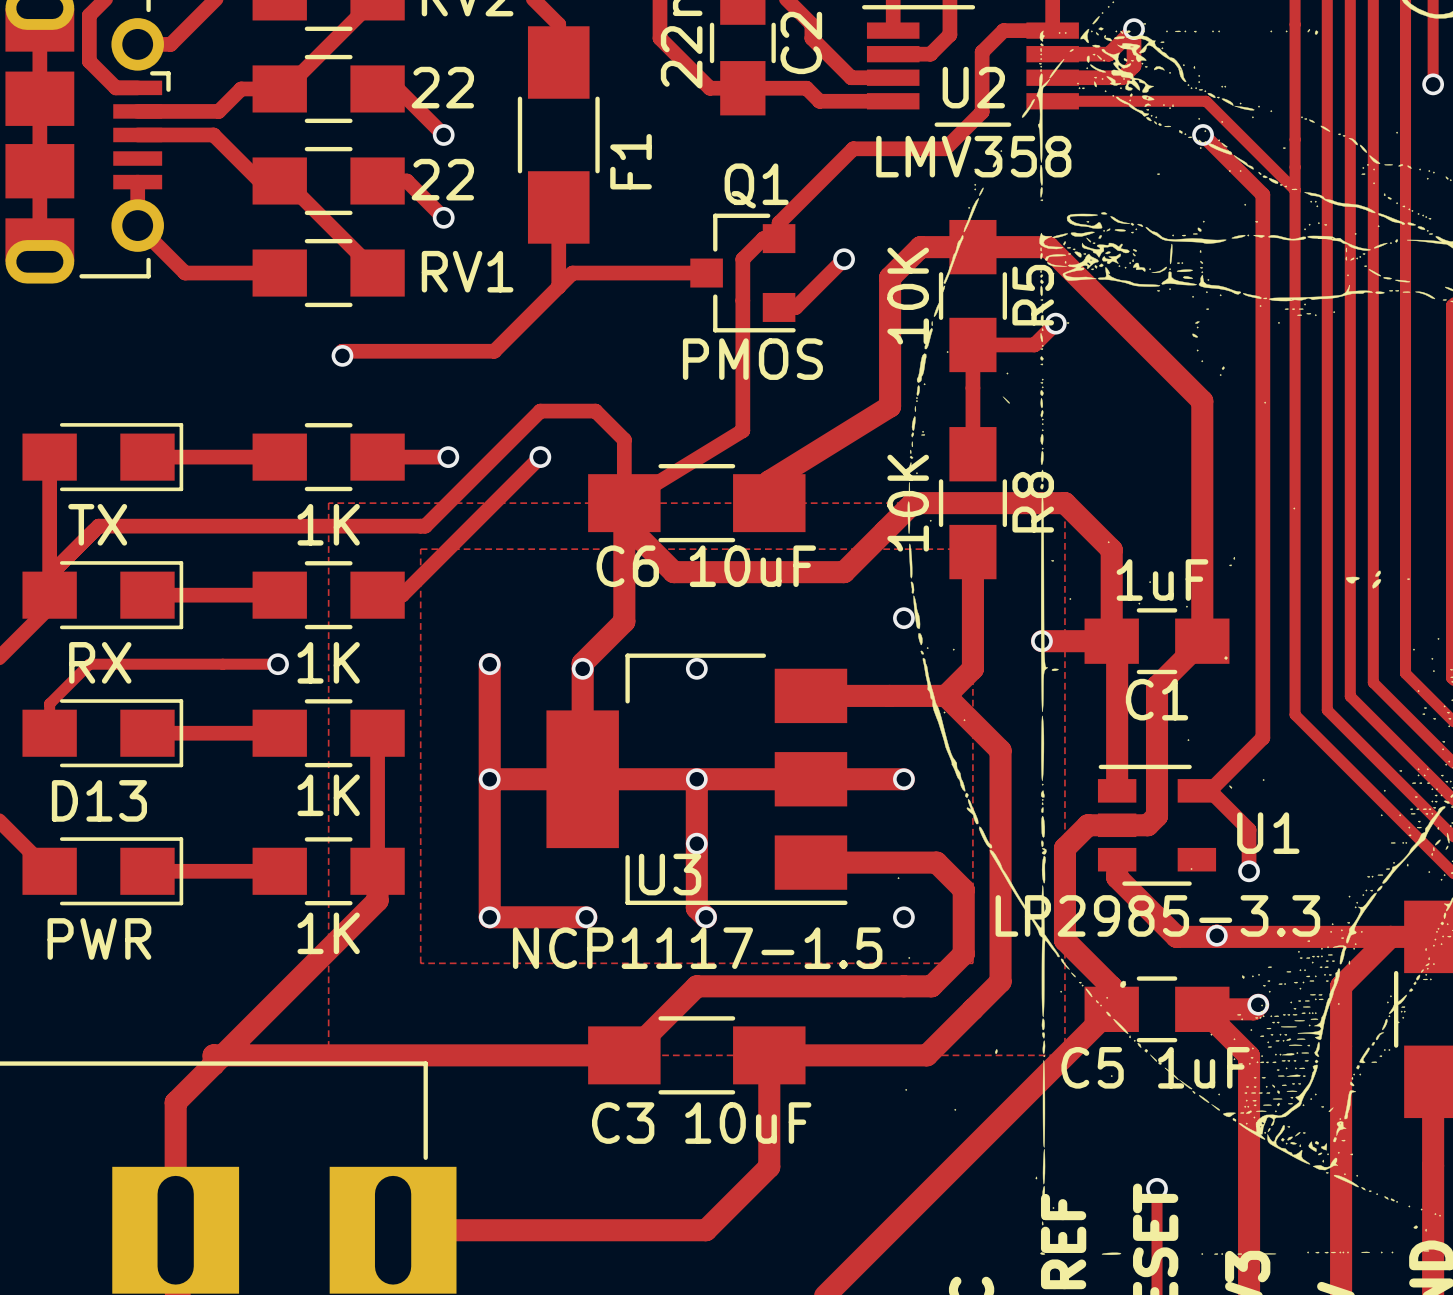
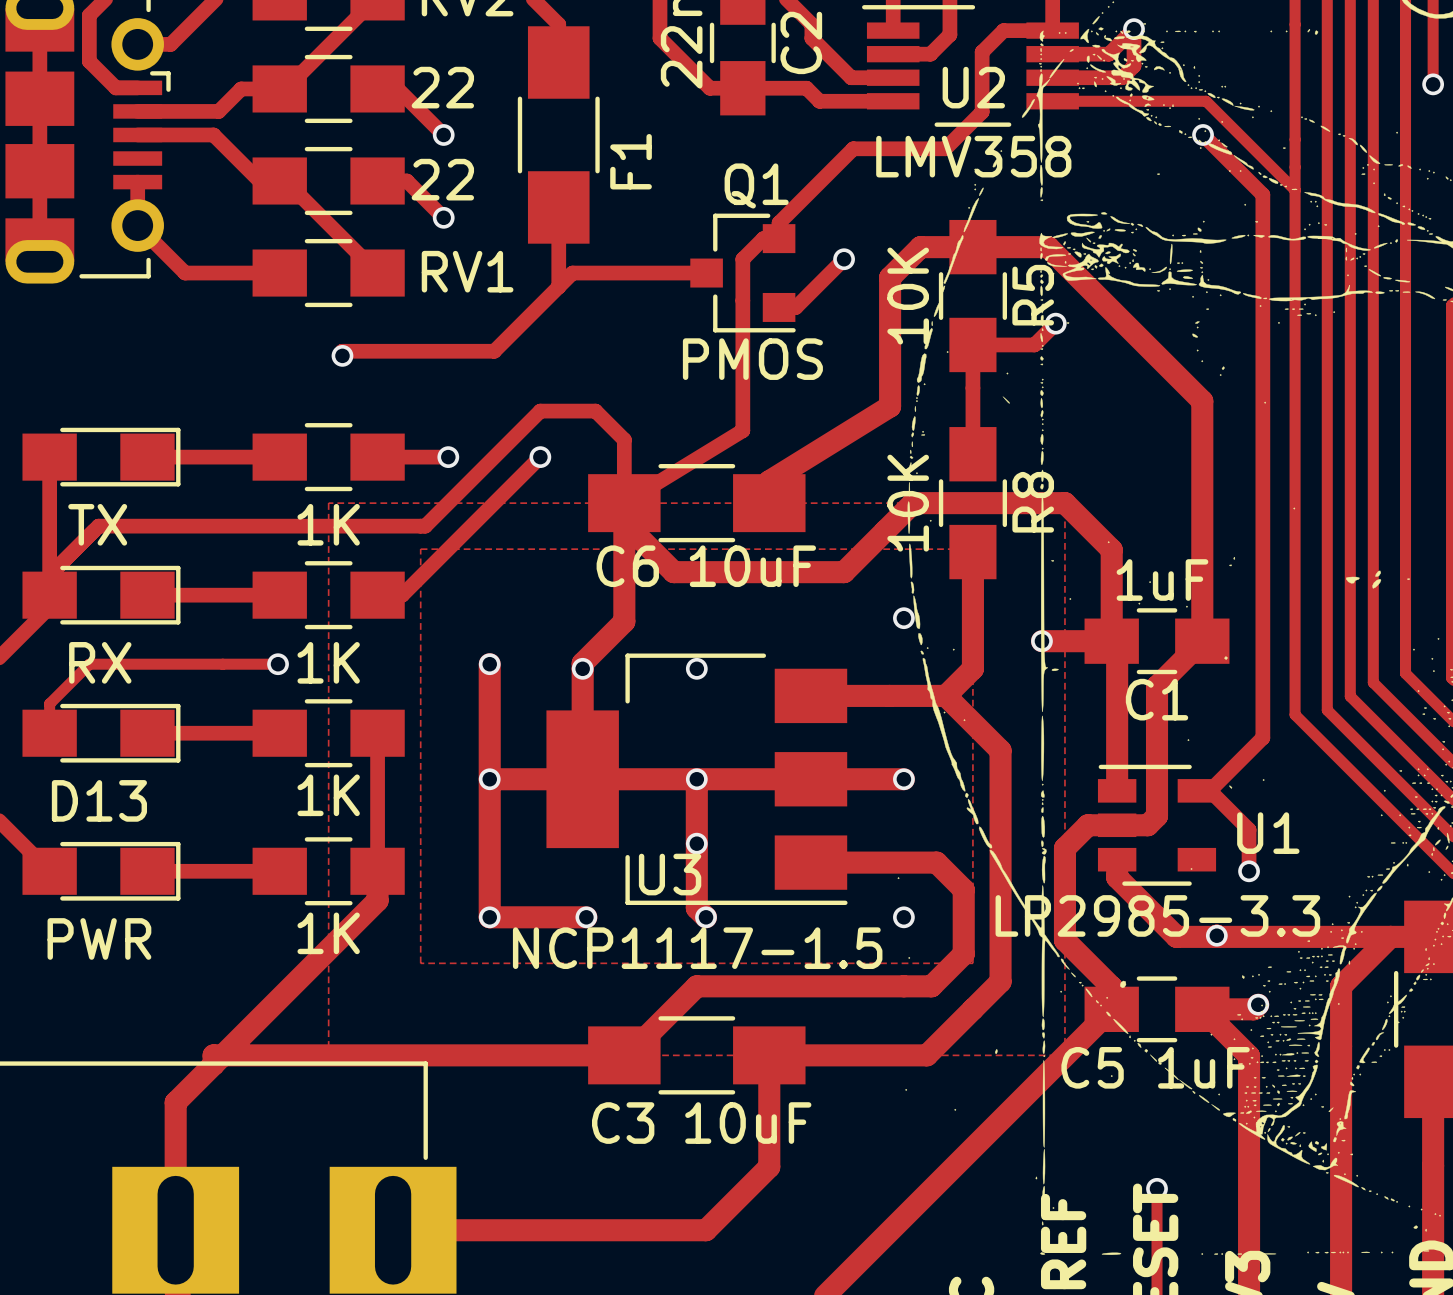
part footprint: [22, 423, 184, 492] -> [22, 427, 181, 487]
part footprint: [22, 561, 184, 630] -> [22, 565, 181, 625]
part footprint: [22, 699, 184, 768] -> [22, 703, 181, 763]
part footprint: [22, 837, 184, 906] -> [22, 841, 181, 901]

